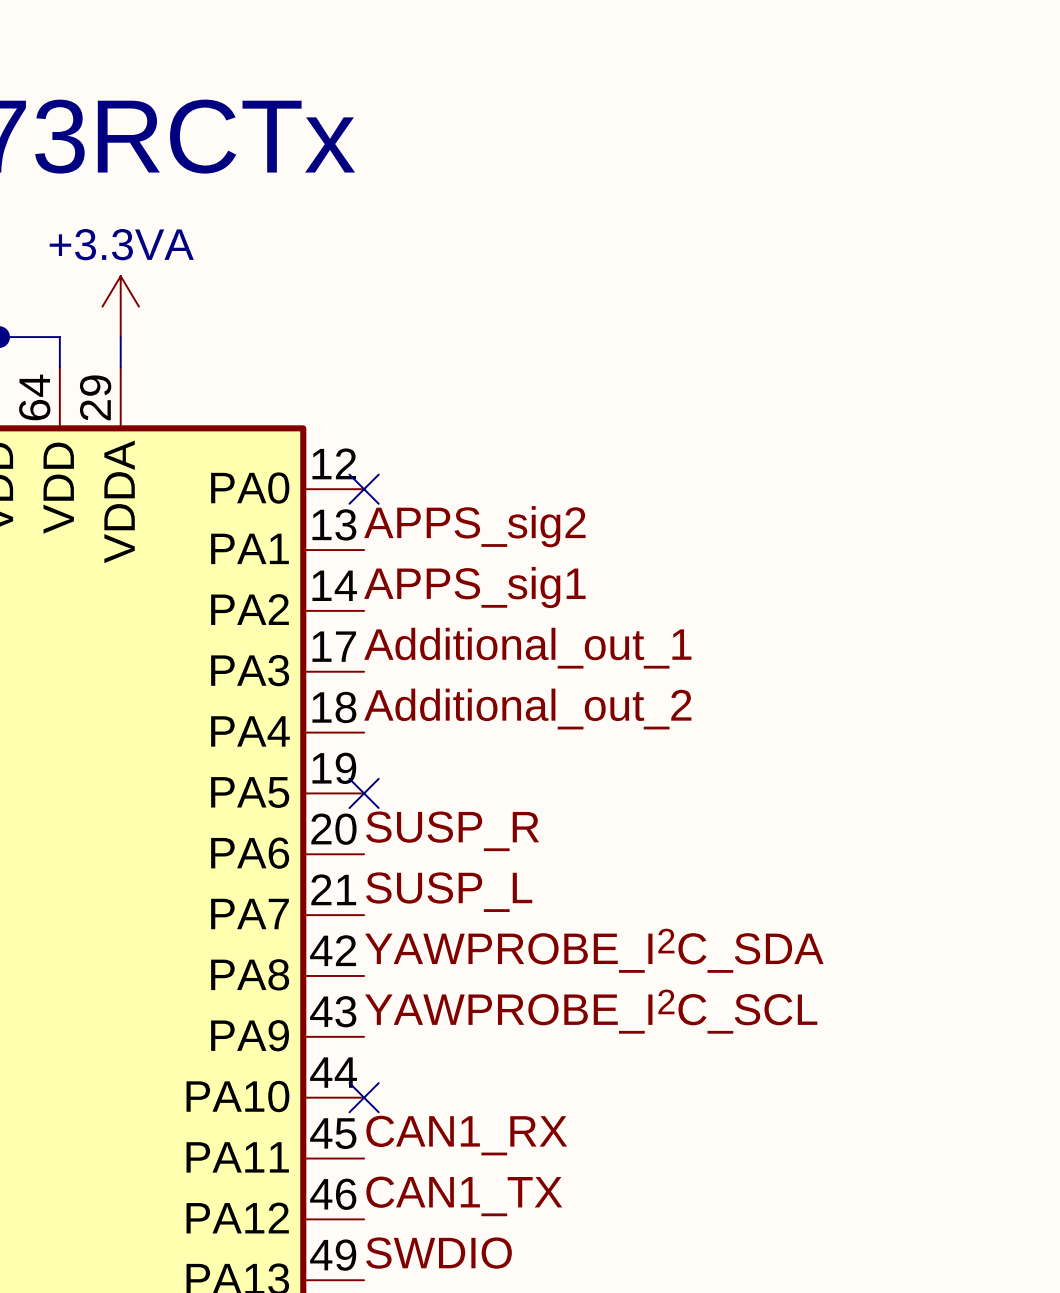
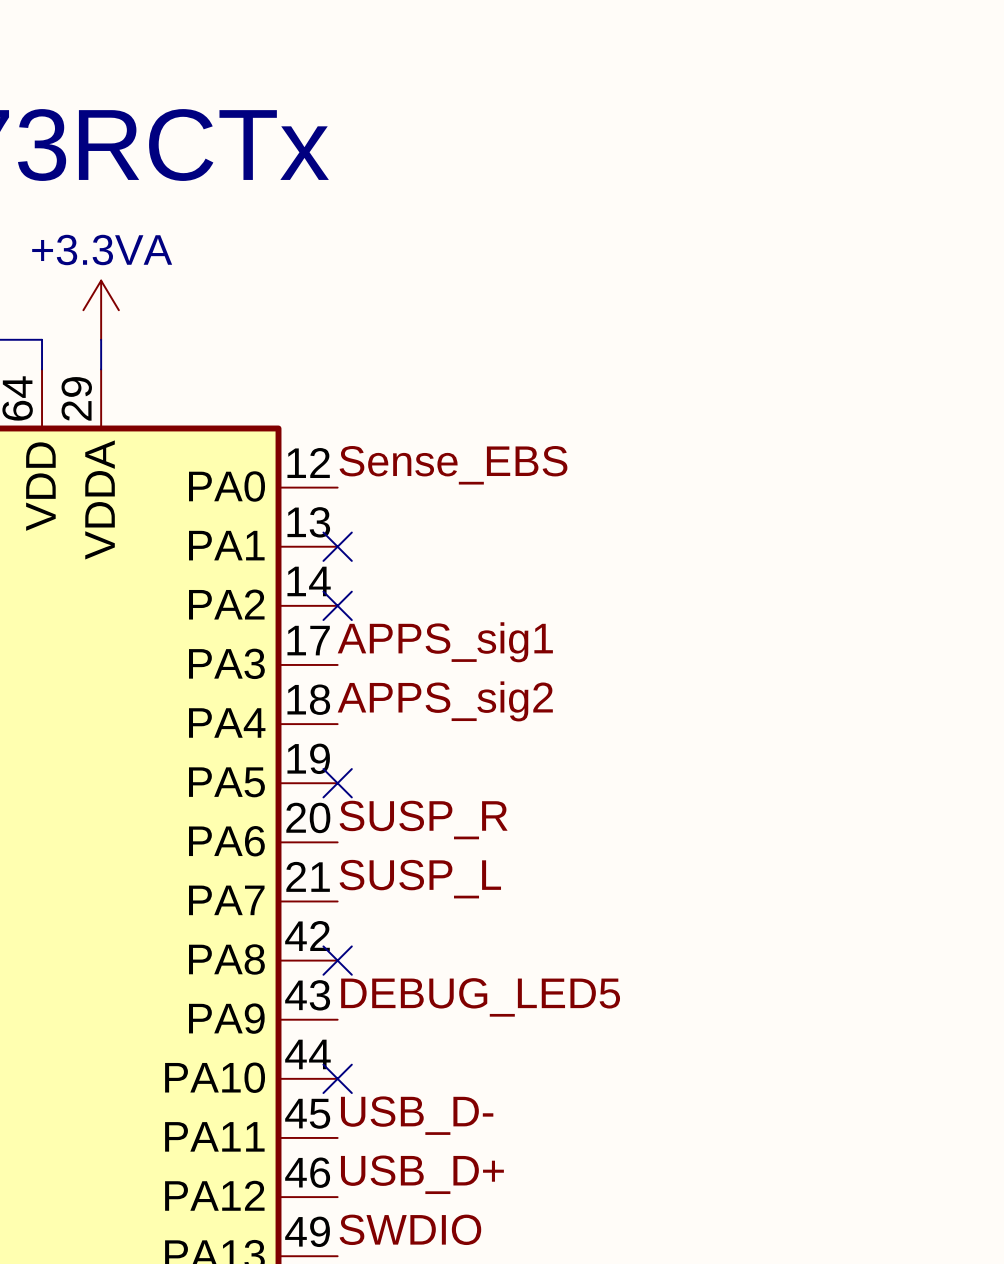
label: none -> Sense_EBS (453, 465)
no-connect mark: (364, 489) -> none
label: APPS_sig2 (474, 526) -> none
no-connect mark: none -> (337, 546)
label: APPS_sig1 (474, 587) -> none
no-connect mark: none -> (337, 605)
label: Additional_out_1 (527, 648) -> APPS_sig1 (445, 642)
label: Additional_out_2 (527, 709) -> APPS_sig2 (445, 701)
label: YAWPROBE_I2C_SDA (594, 950) -> none
no-connect mark: none -> (337, 960)
label: YAWPROBE_I2C_SCL (591, 1011) -> DEBUG_LED5 (480, 997)
label: CAN1_RX (466, 1135) -> USB_D- (417, 1115)
label: CAN1_TX (464, 1196) -> USB_D+ (422, 1174)

